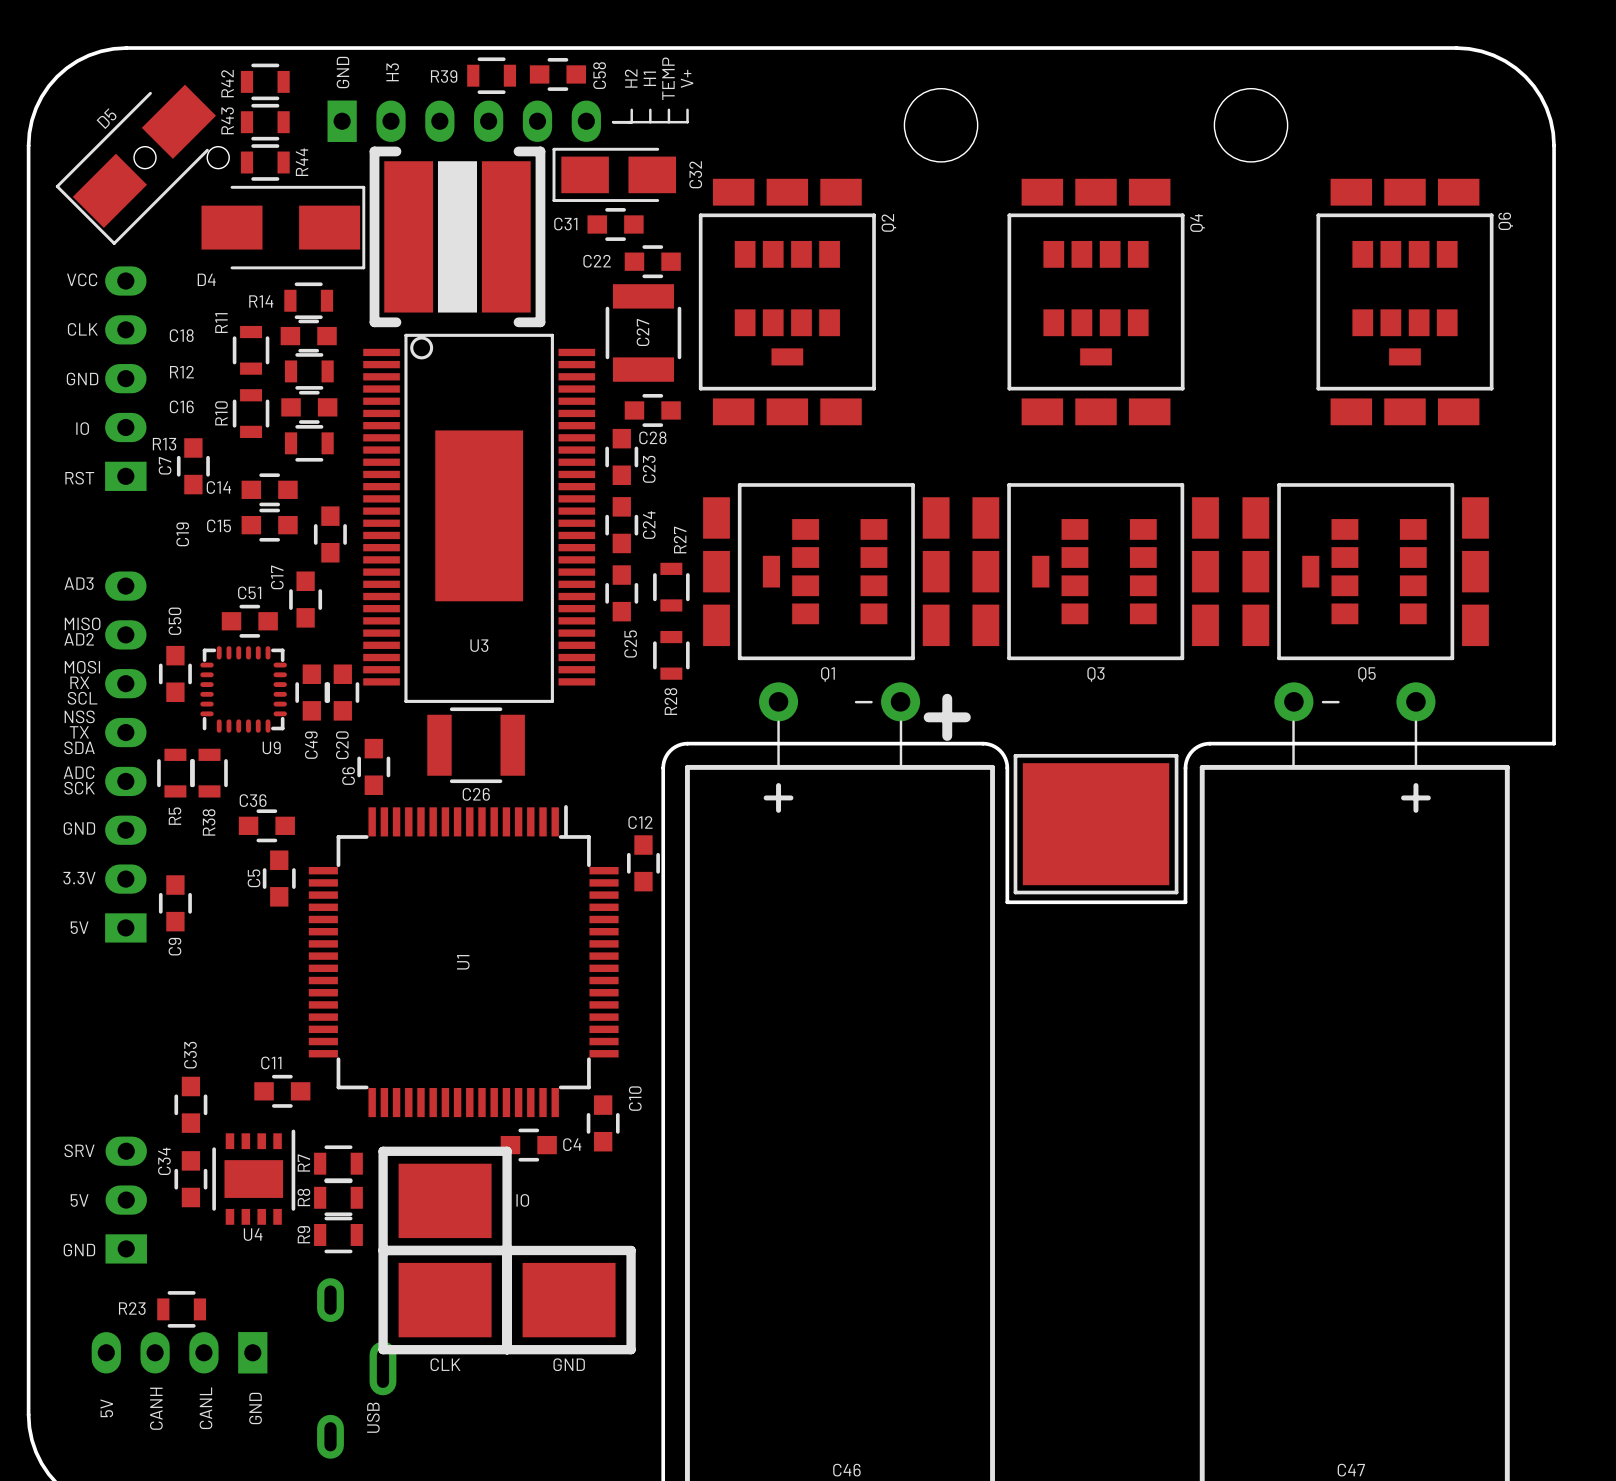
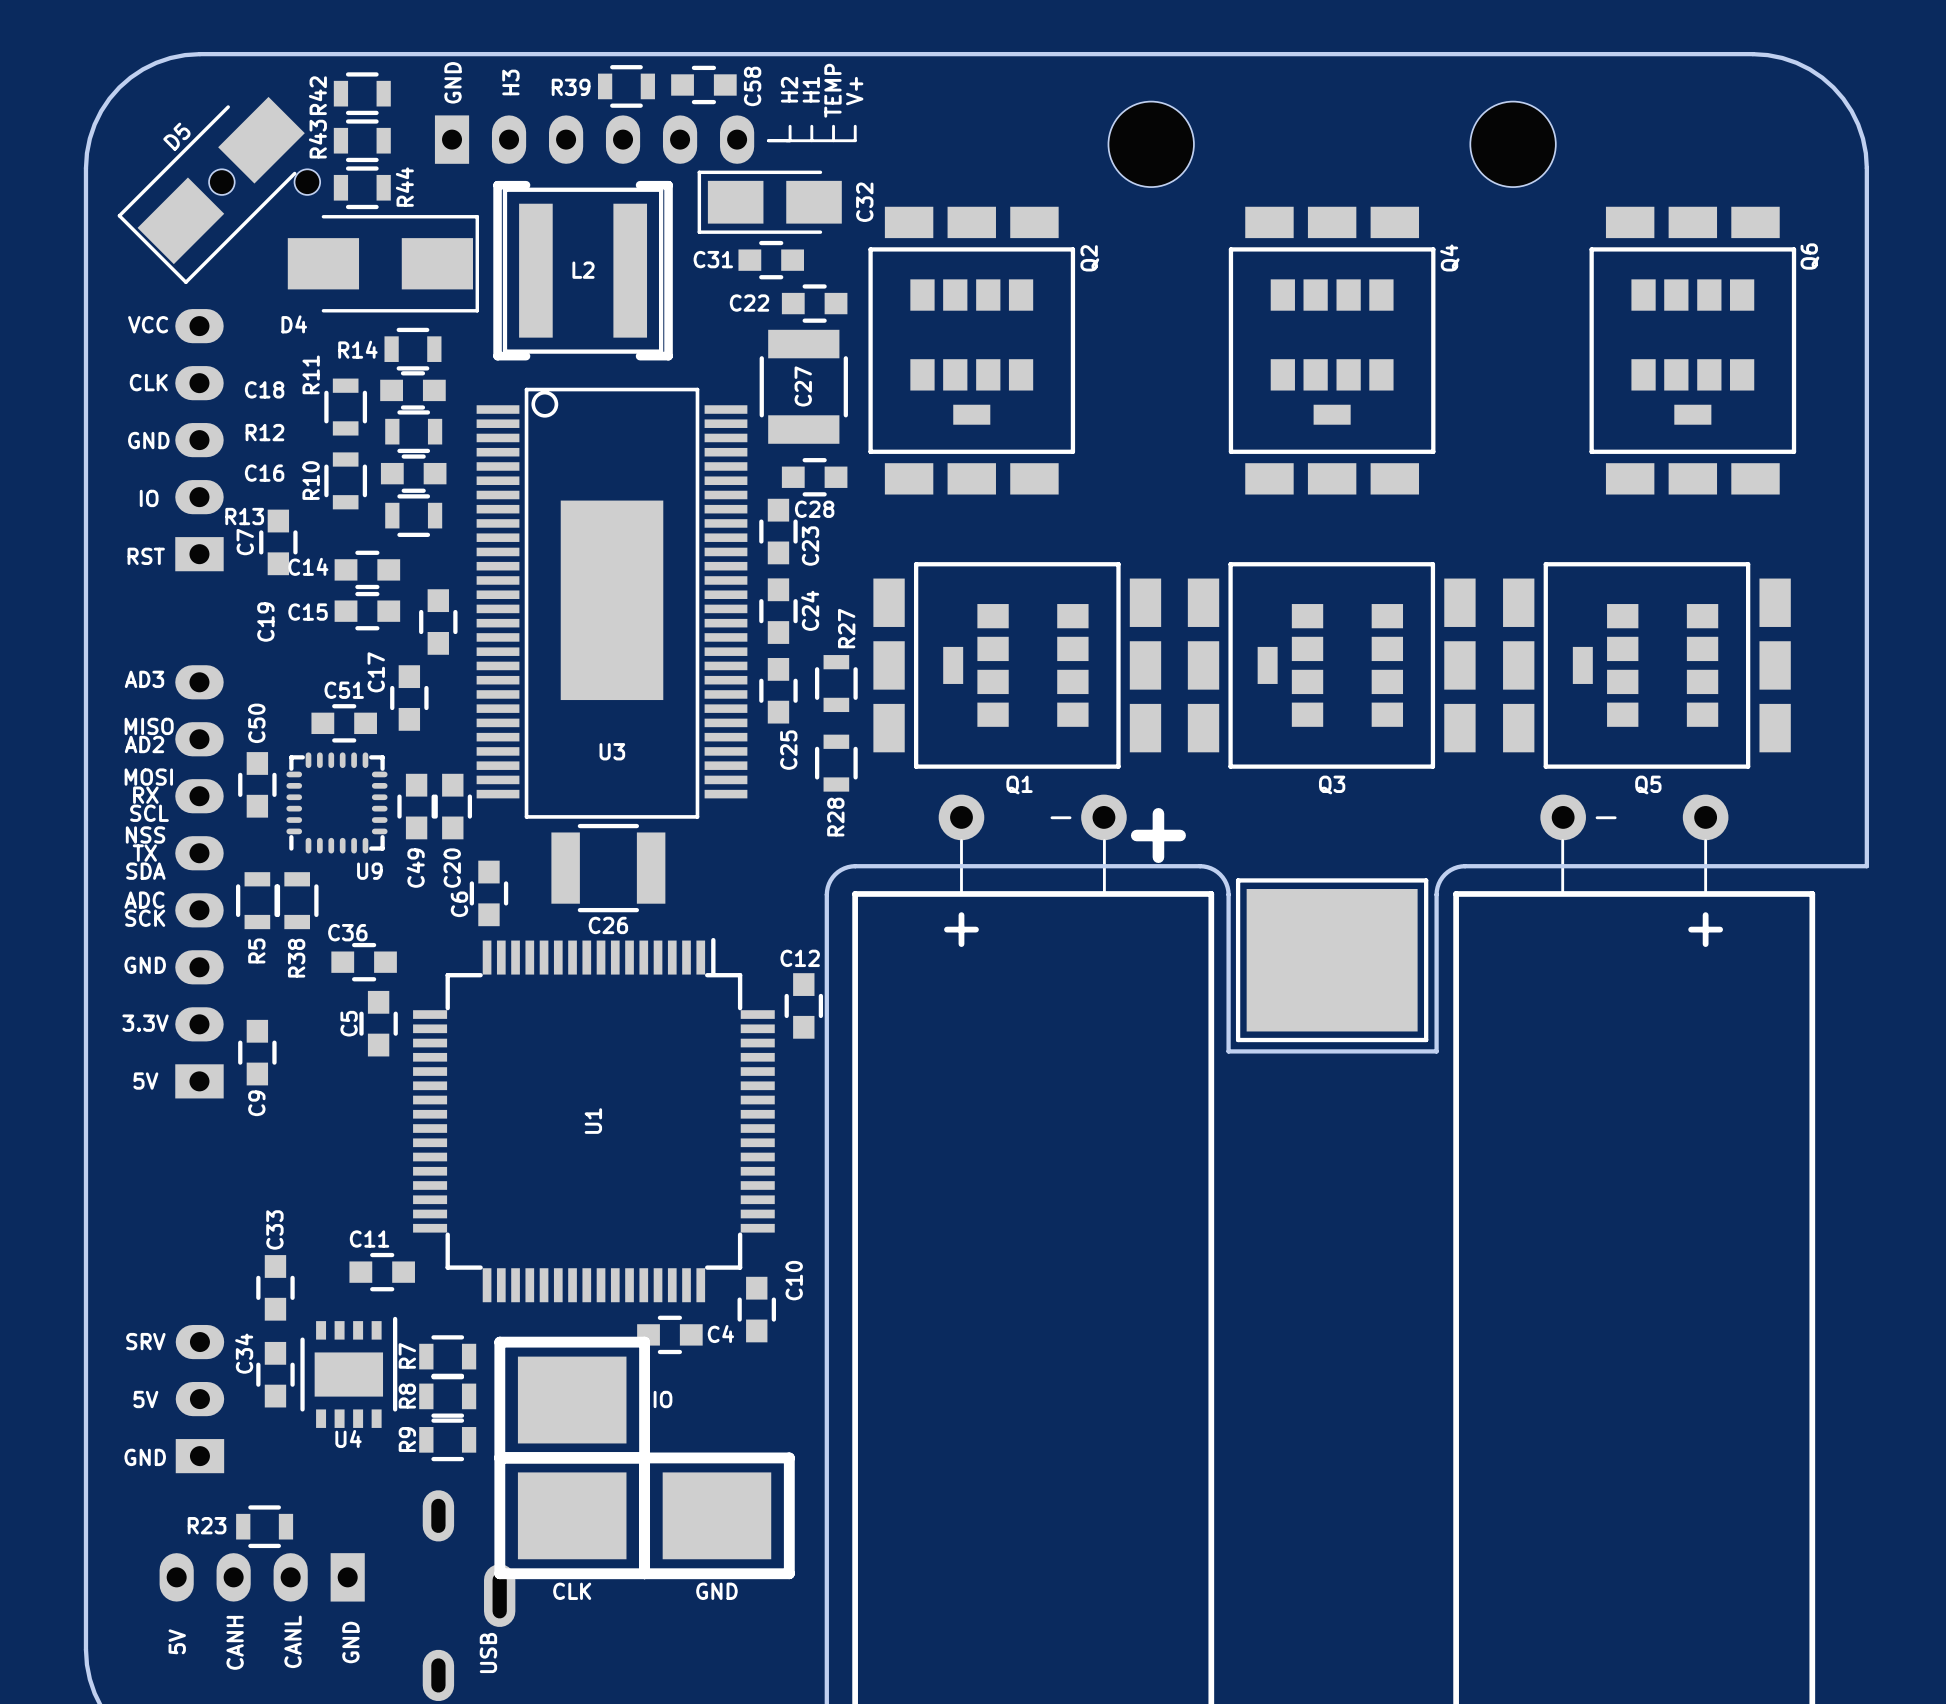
L2 footprint: [369, 146, 546, 328] -> [493, 180, 673, 361]

